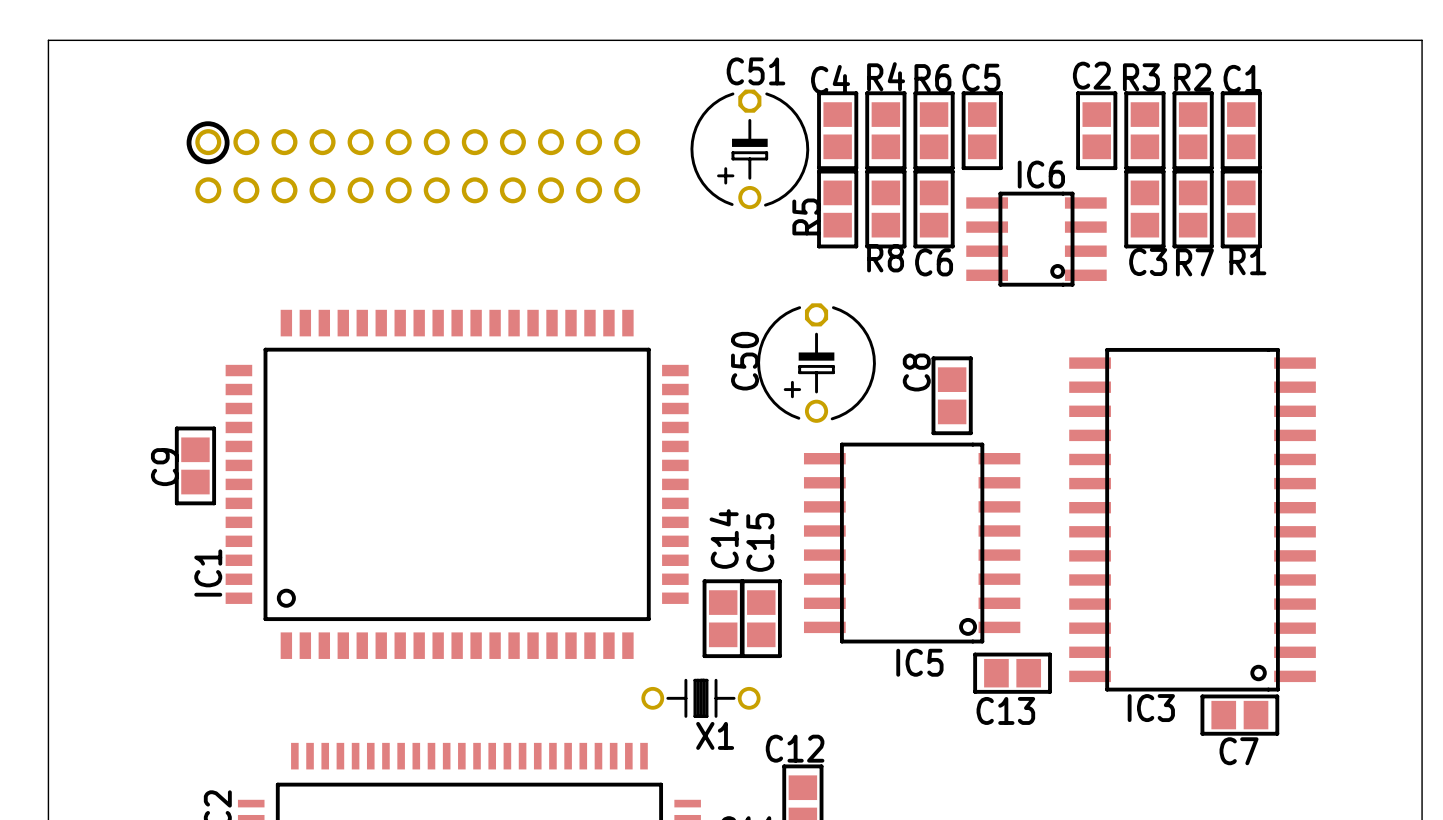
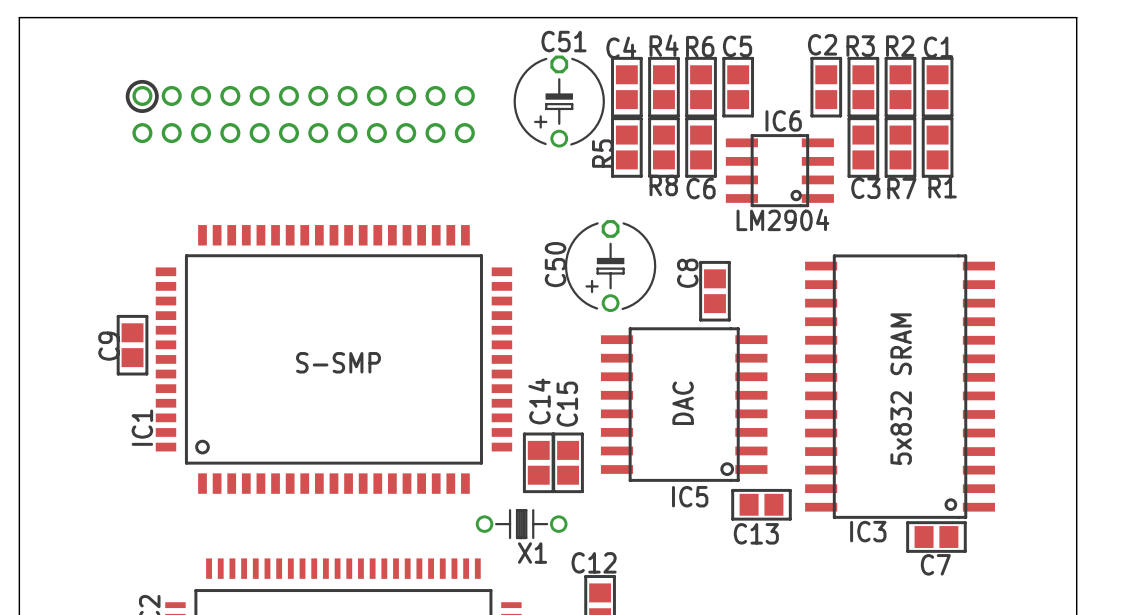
IC6 value: none -> LM2904 (782, 219)
IC1 value: none -> S-SMP (338, 362)
IC3 value: none -> 5x832 SRAM (901, 389)
IC5 value: none -> DAC (683, 403)

